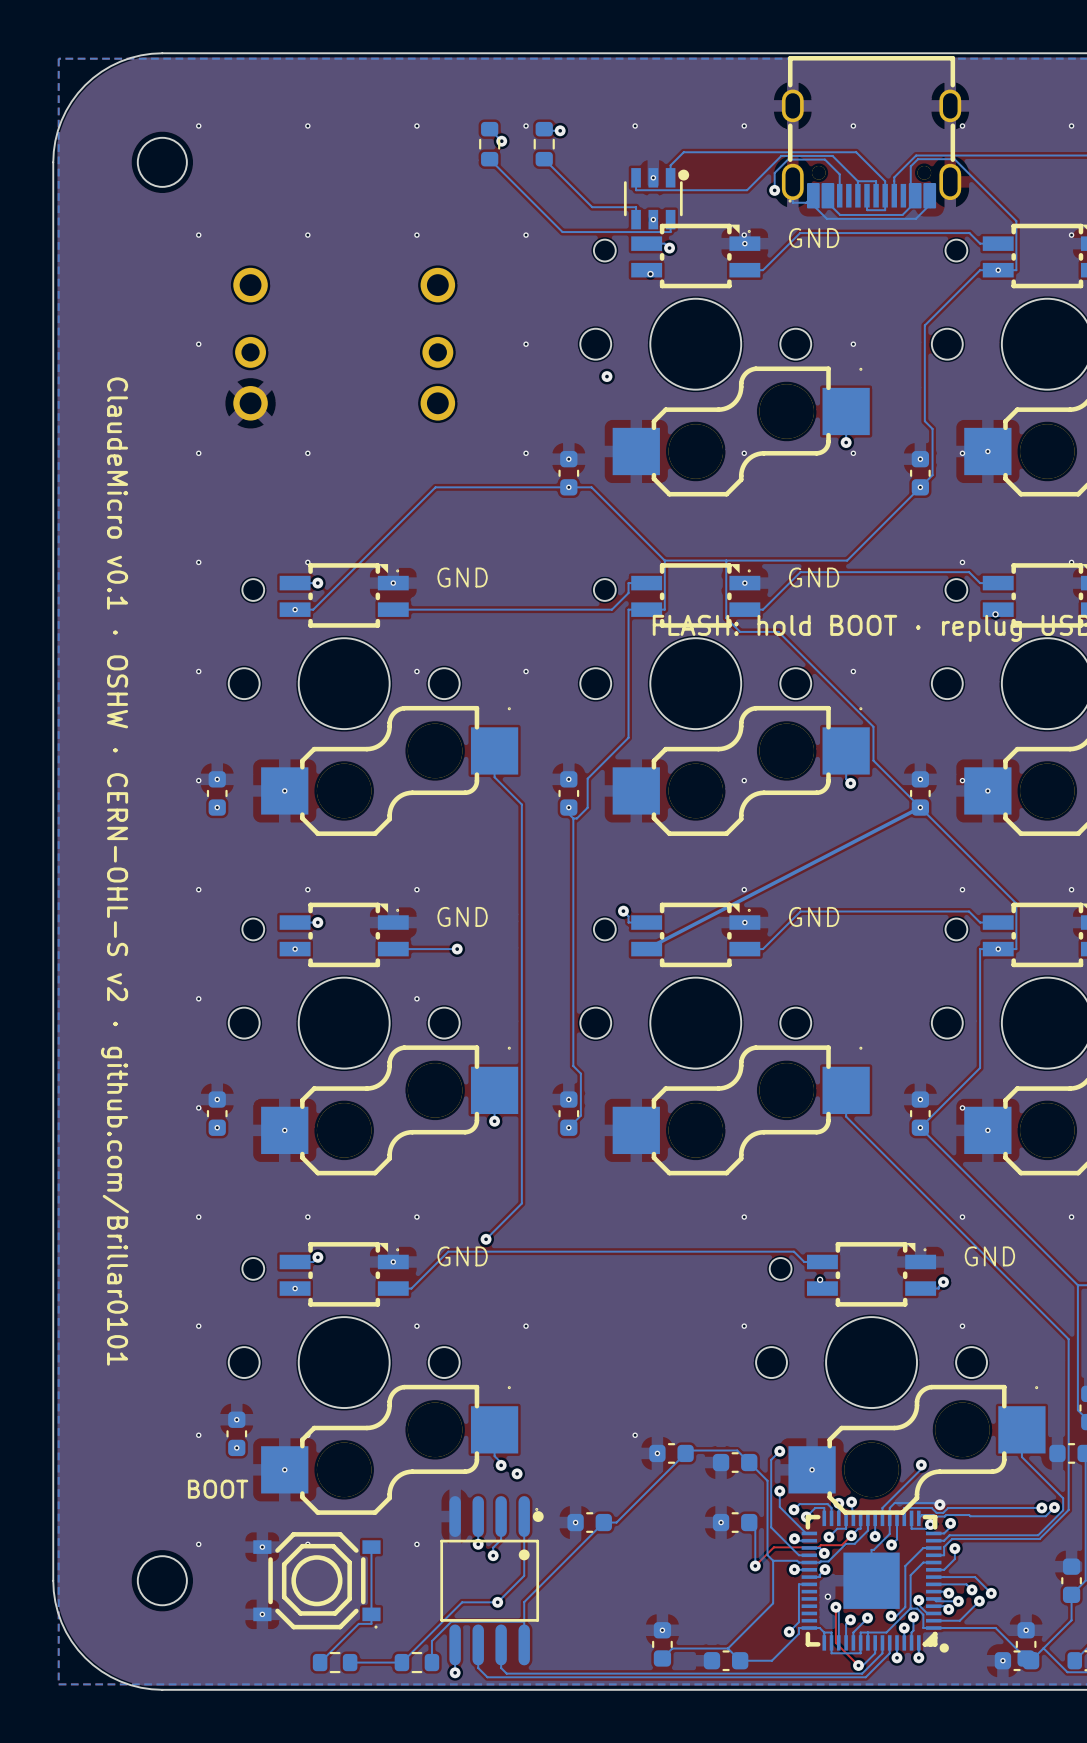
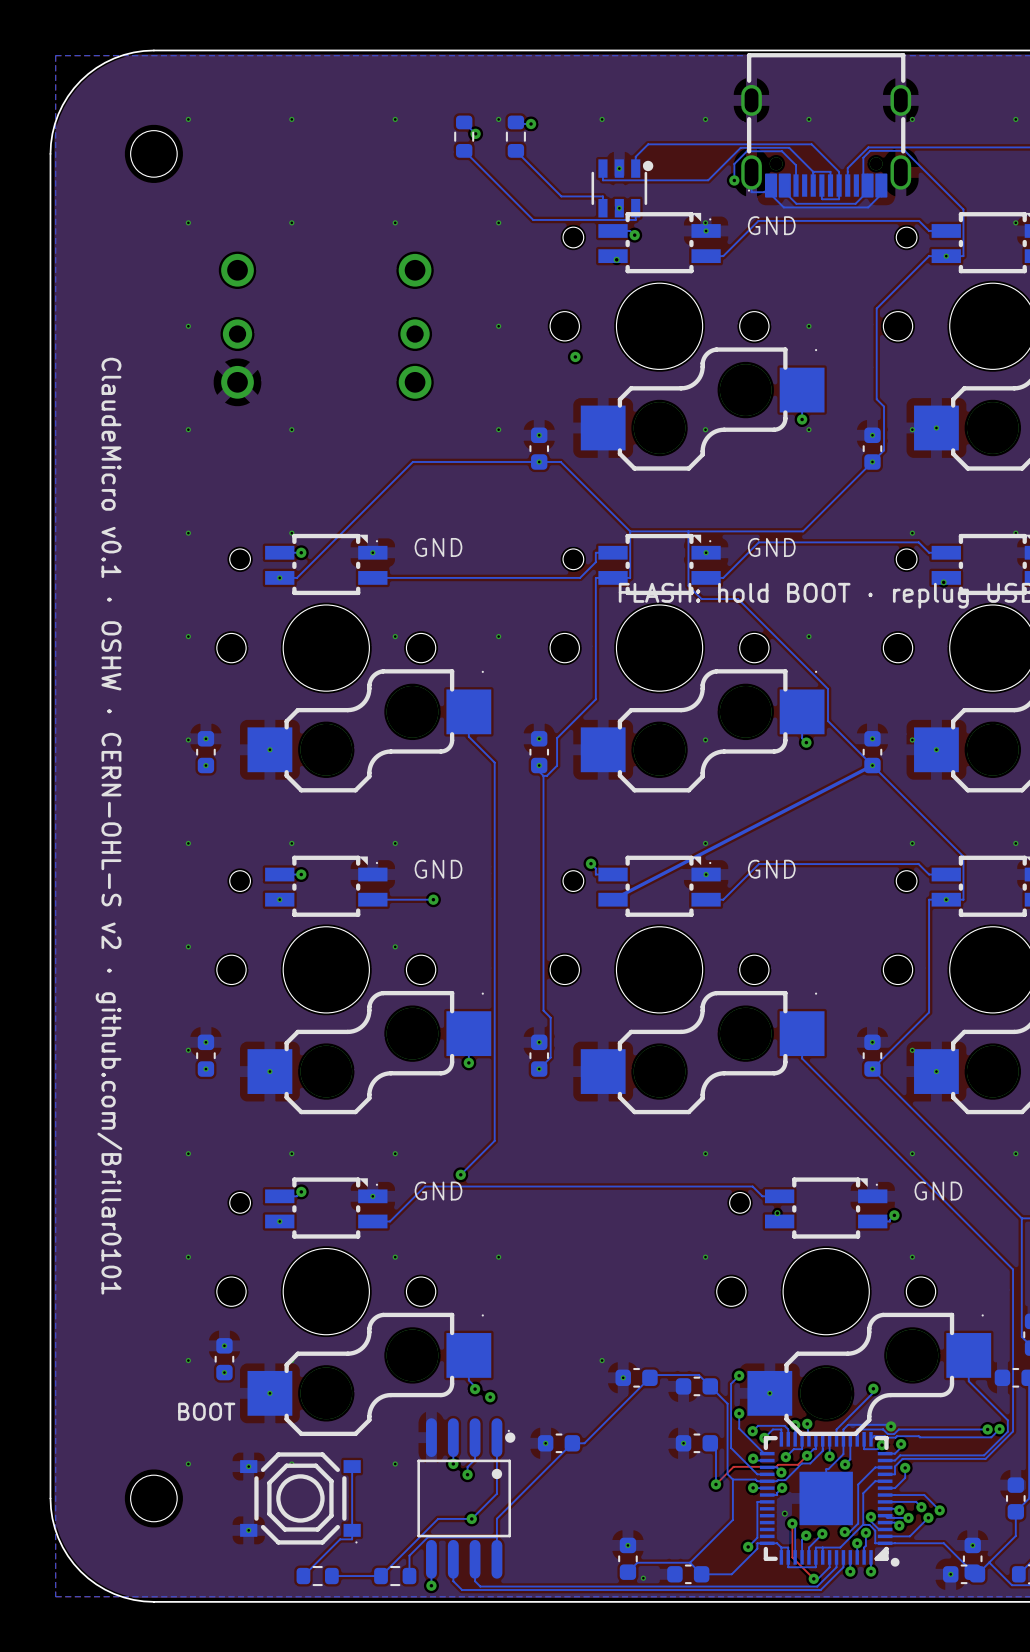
via: none -> (643, 1578)

